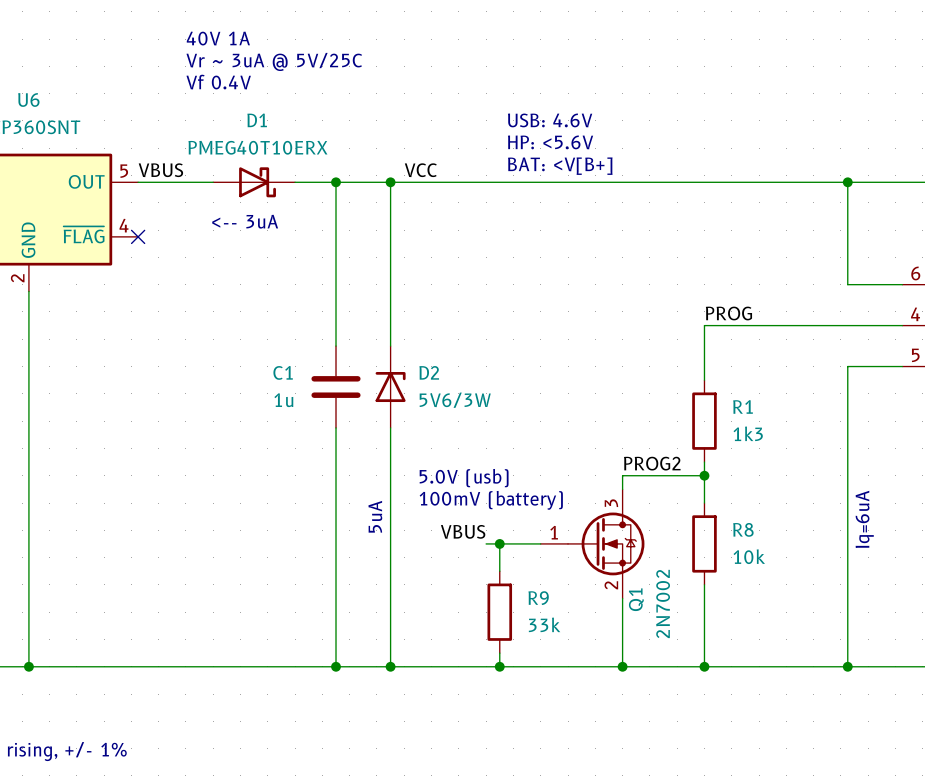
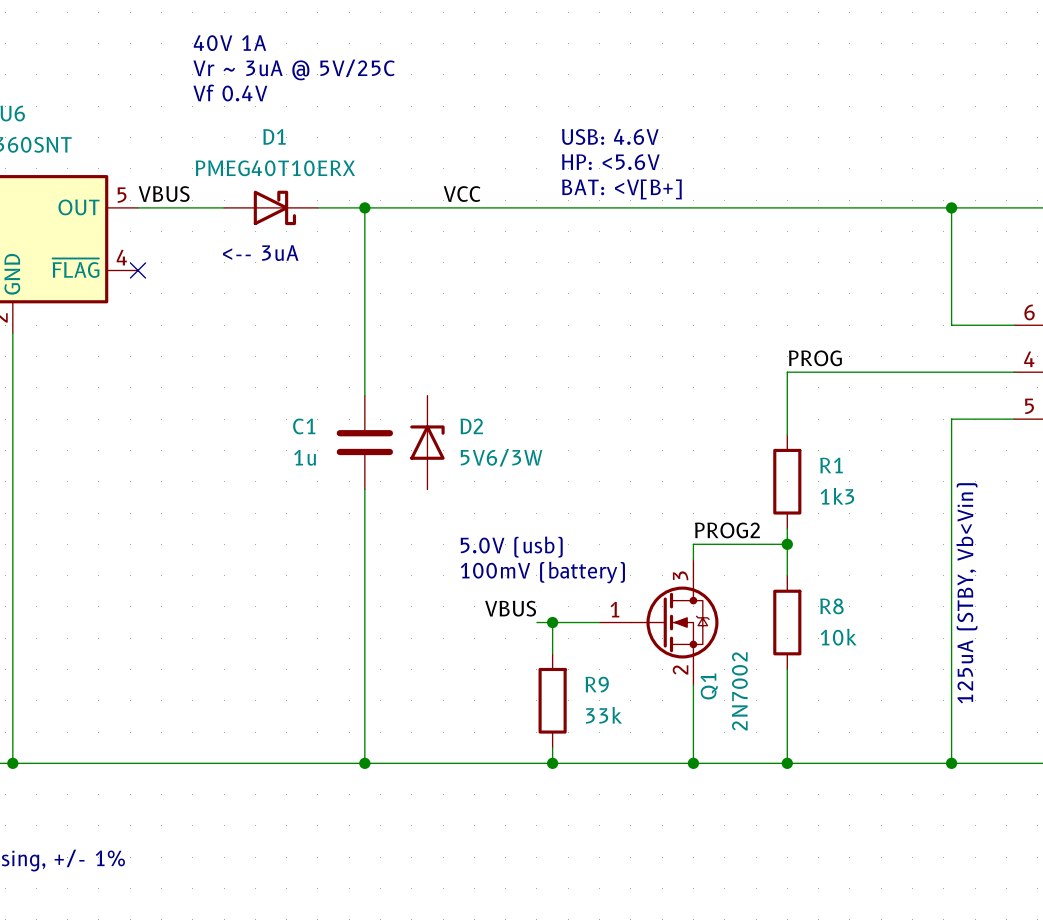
wire: (390, 182) (390, 346) -> none
junction: (390, 182) -> none
wire: (390, 427) (390, 666) -> none
text: 5uA (375, 516) -> none
text: none -> 125uA (STBY, Vb<Vin) (966, 593)
text: Iq=6uA (864, 519) -> none
junction: (390, 666) -> none

